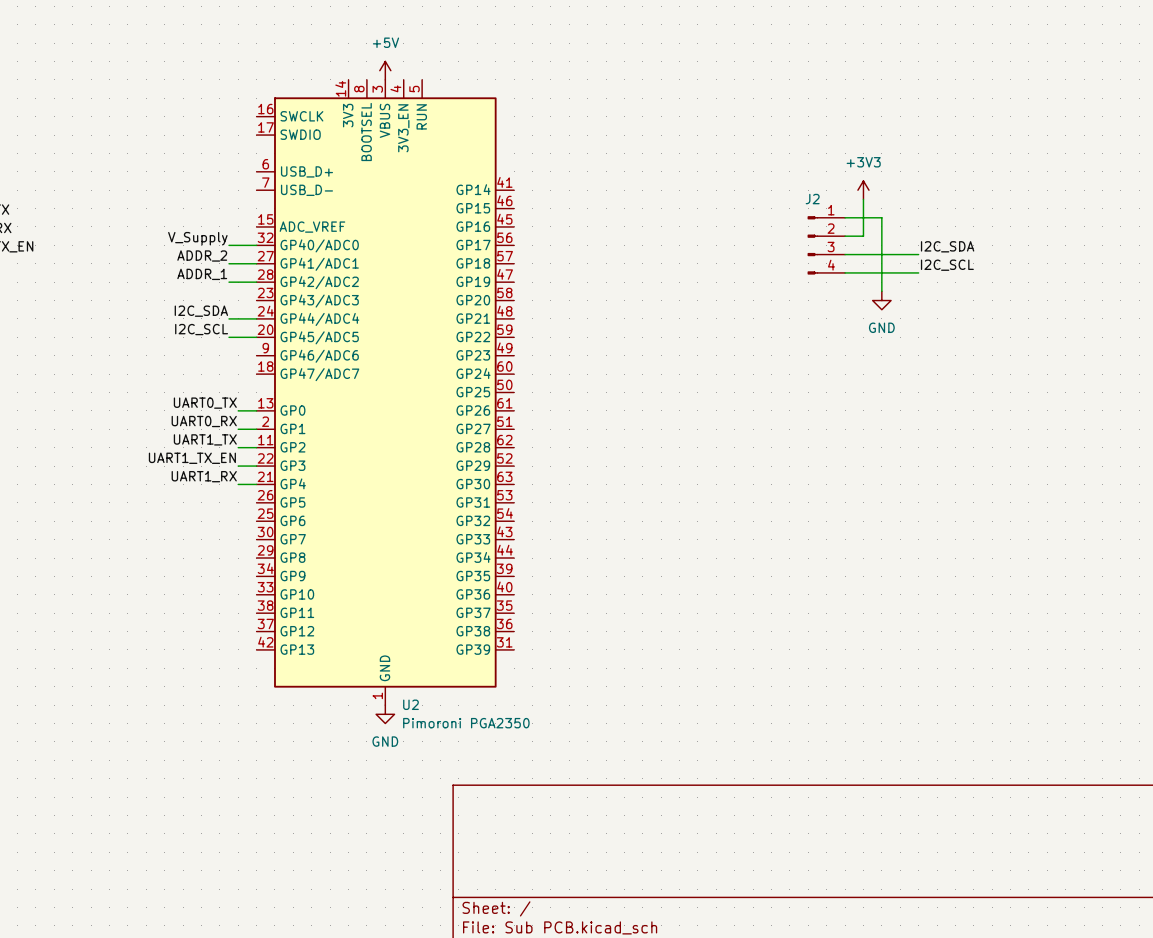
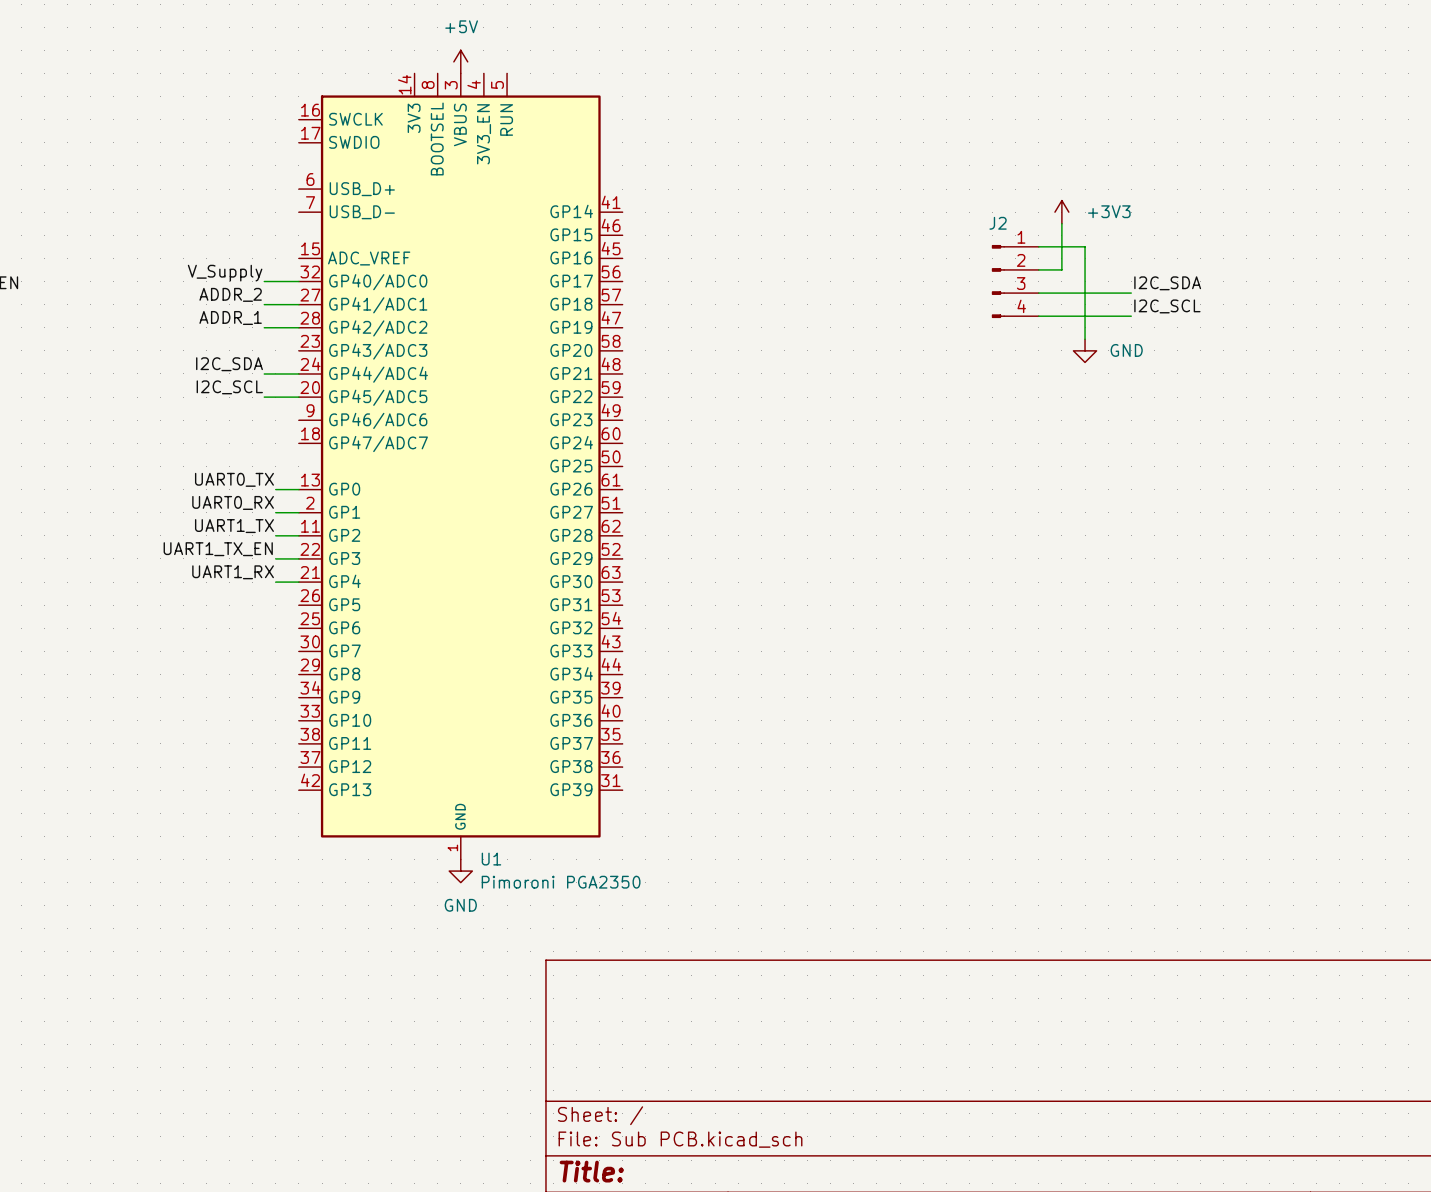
U2 symbol: [256, 79, 515, 706] -> [298, 73, 623, 860]
power symbol text position: +3V3 (863, 162) -> +3V3 (1109, 211)
power symbol text position: GND (881, 327) -> GND (1126, 350)
U2 name: U2 (410, 704) -> U1 (491, 859)

